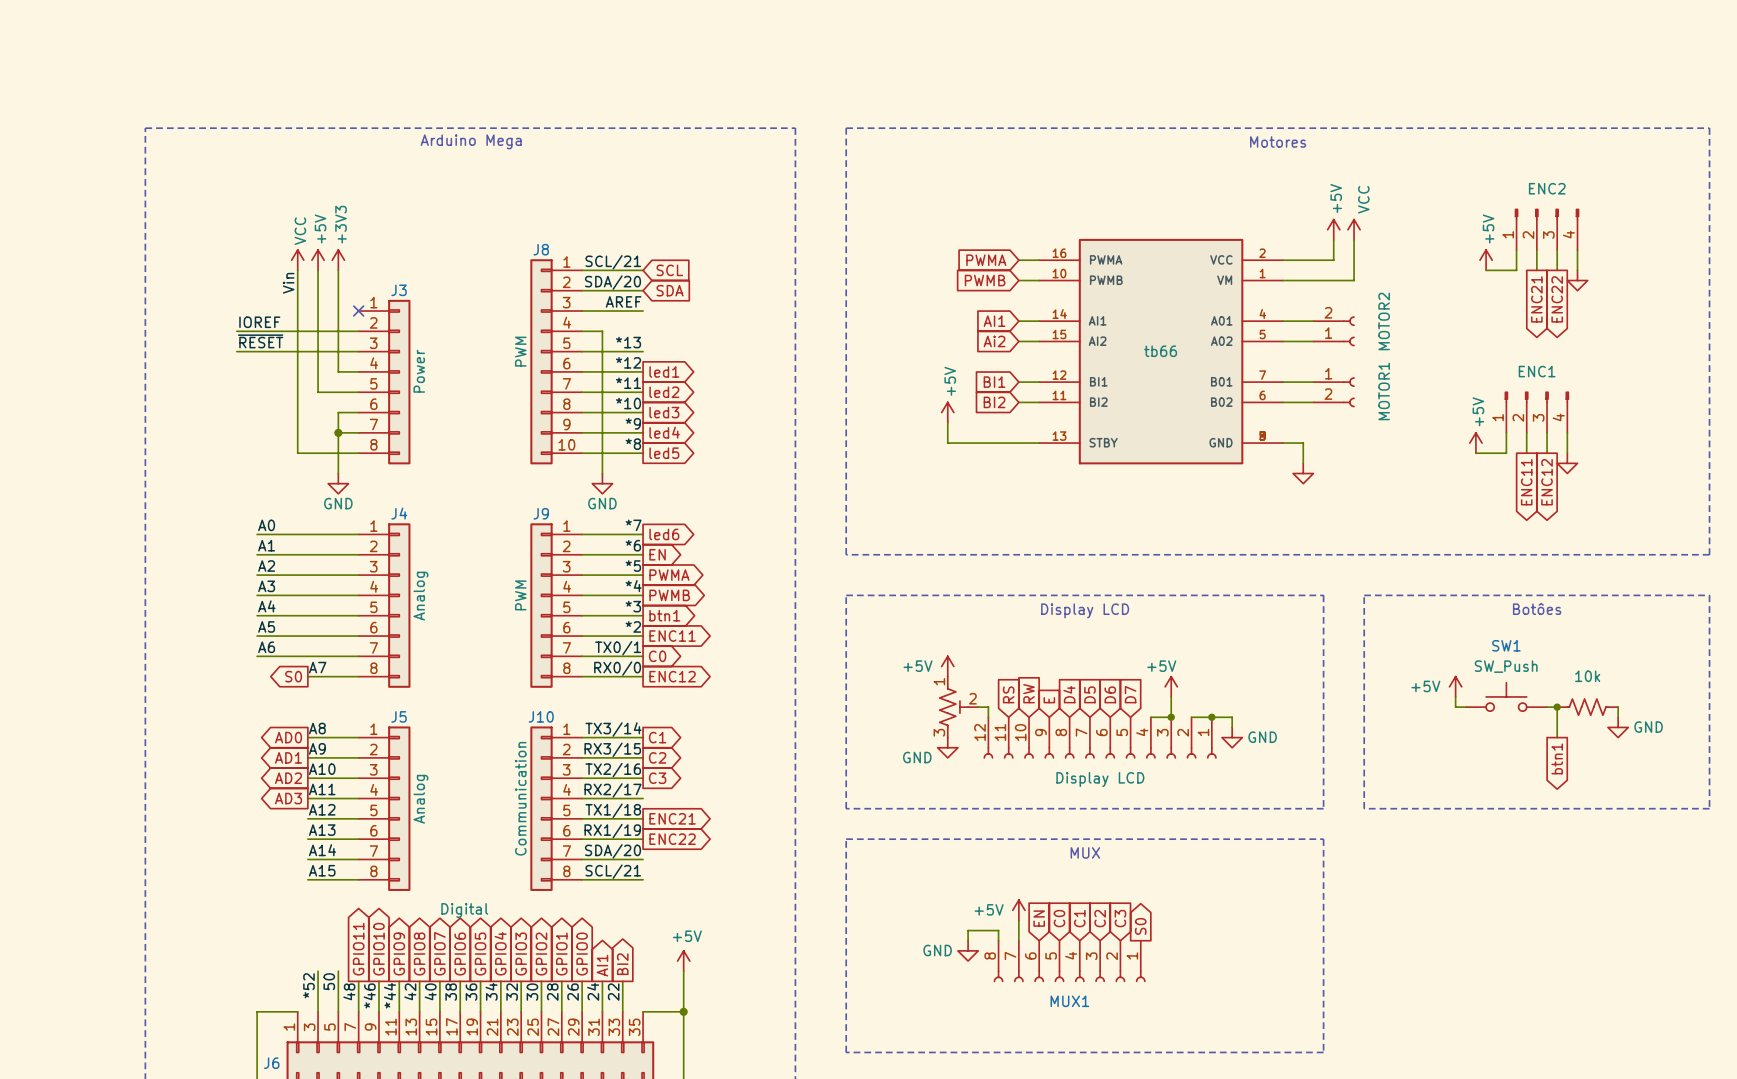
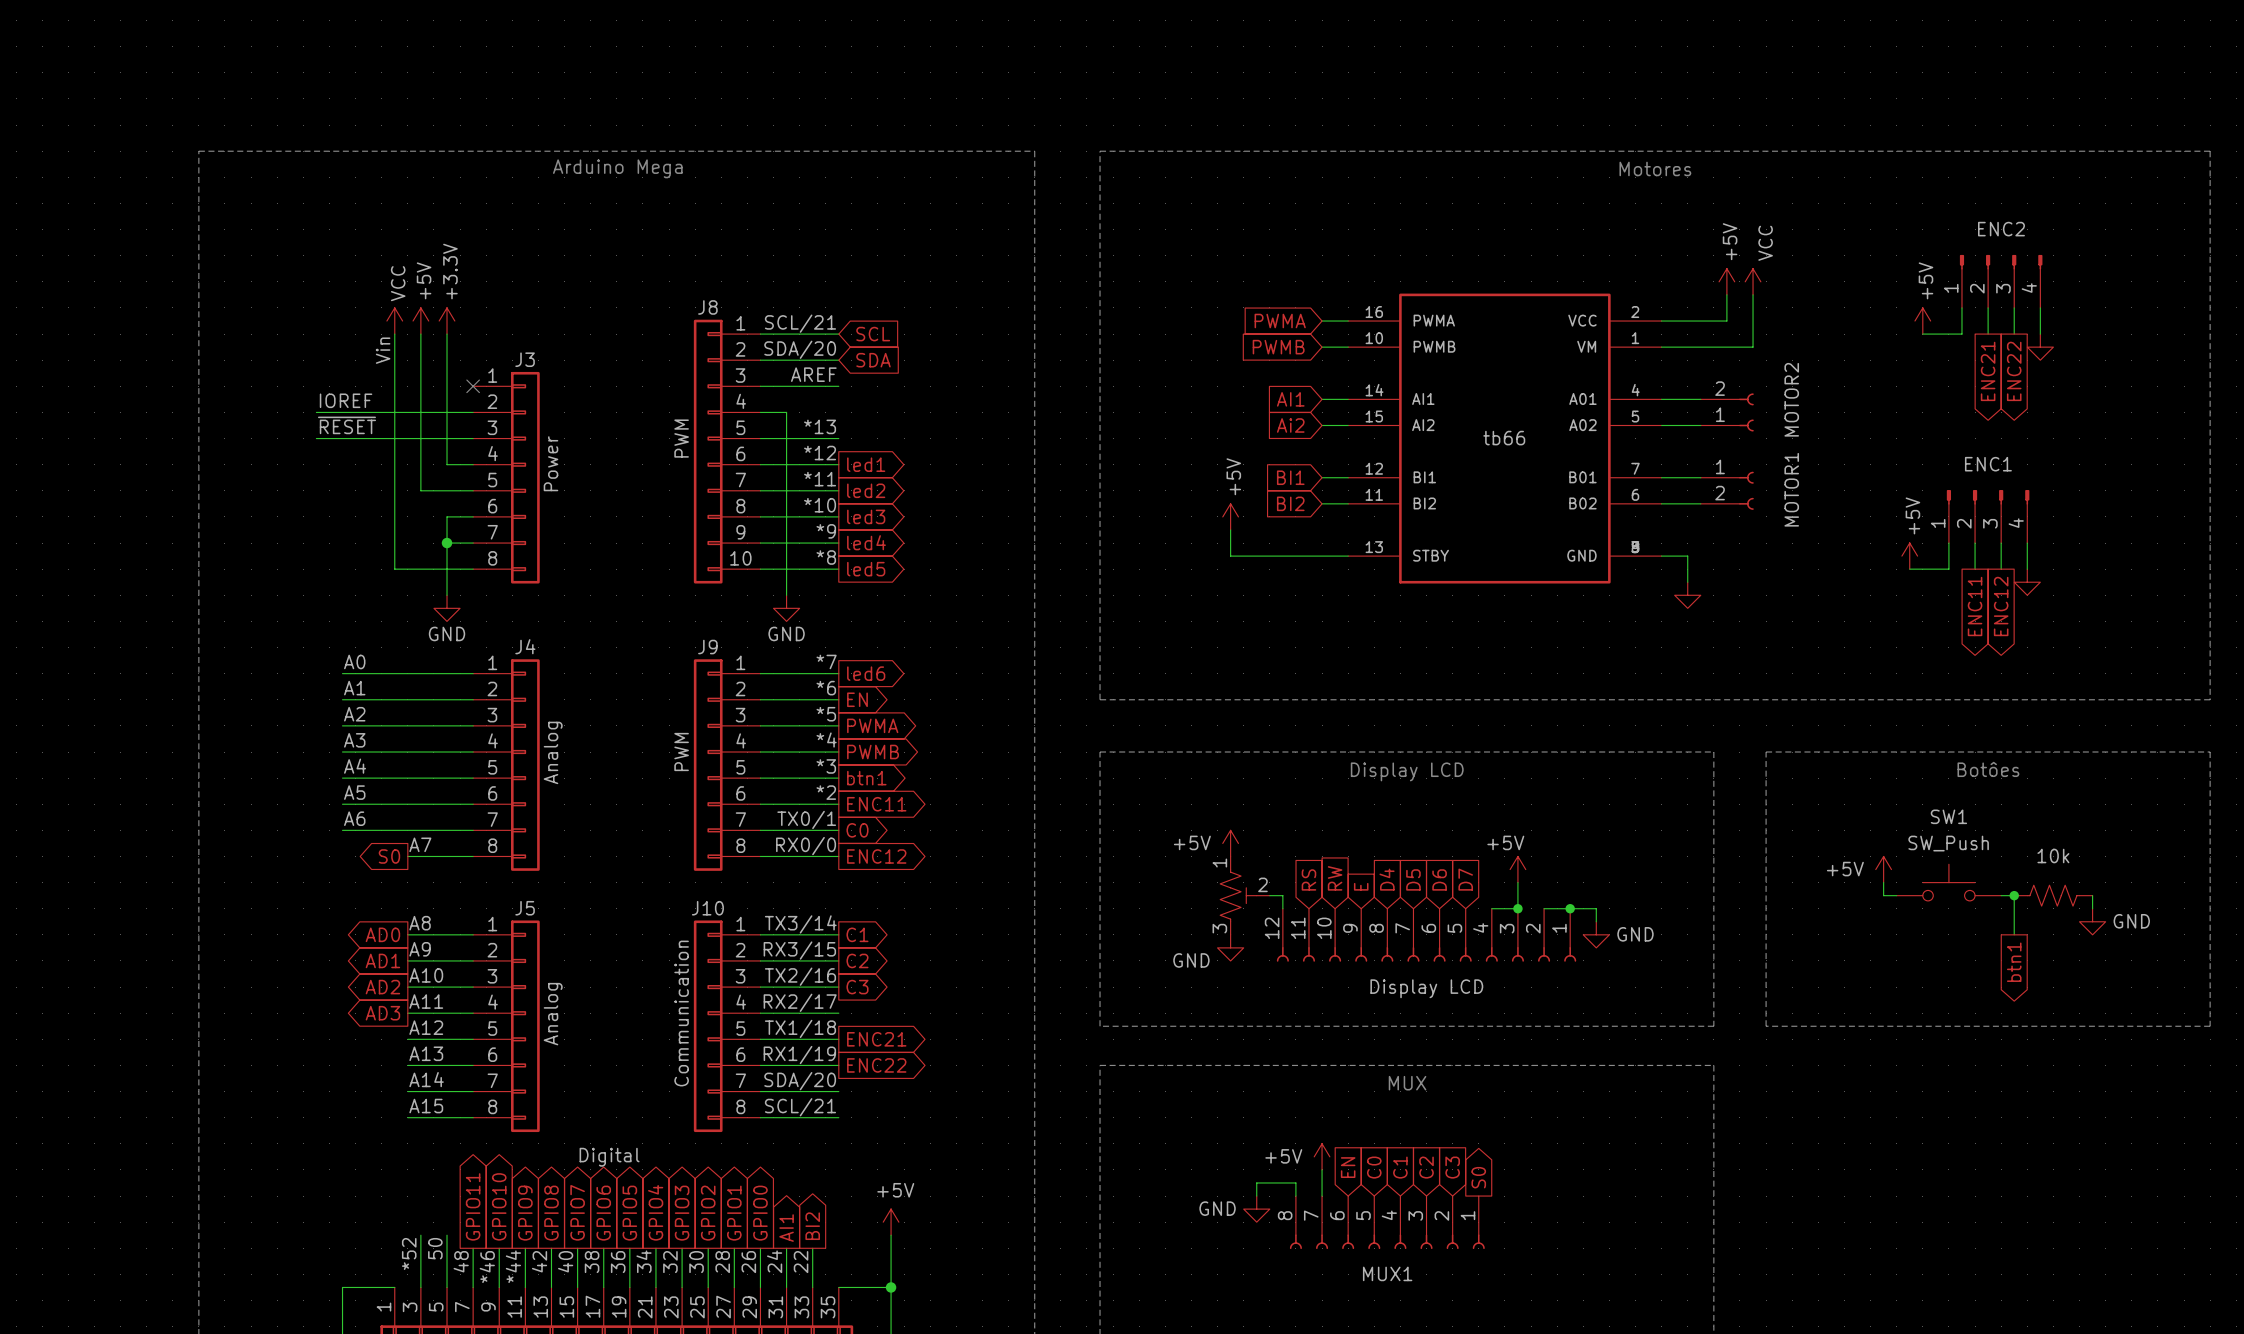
power symbol: +3V3 (338, 260) -> +3.3V (447, 321)

